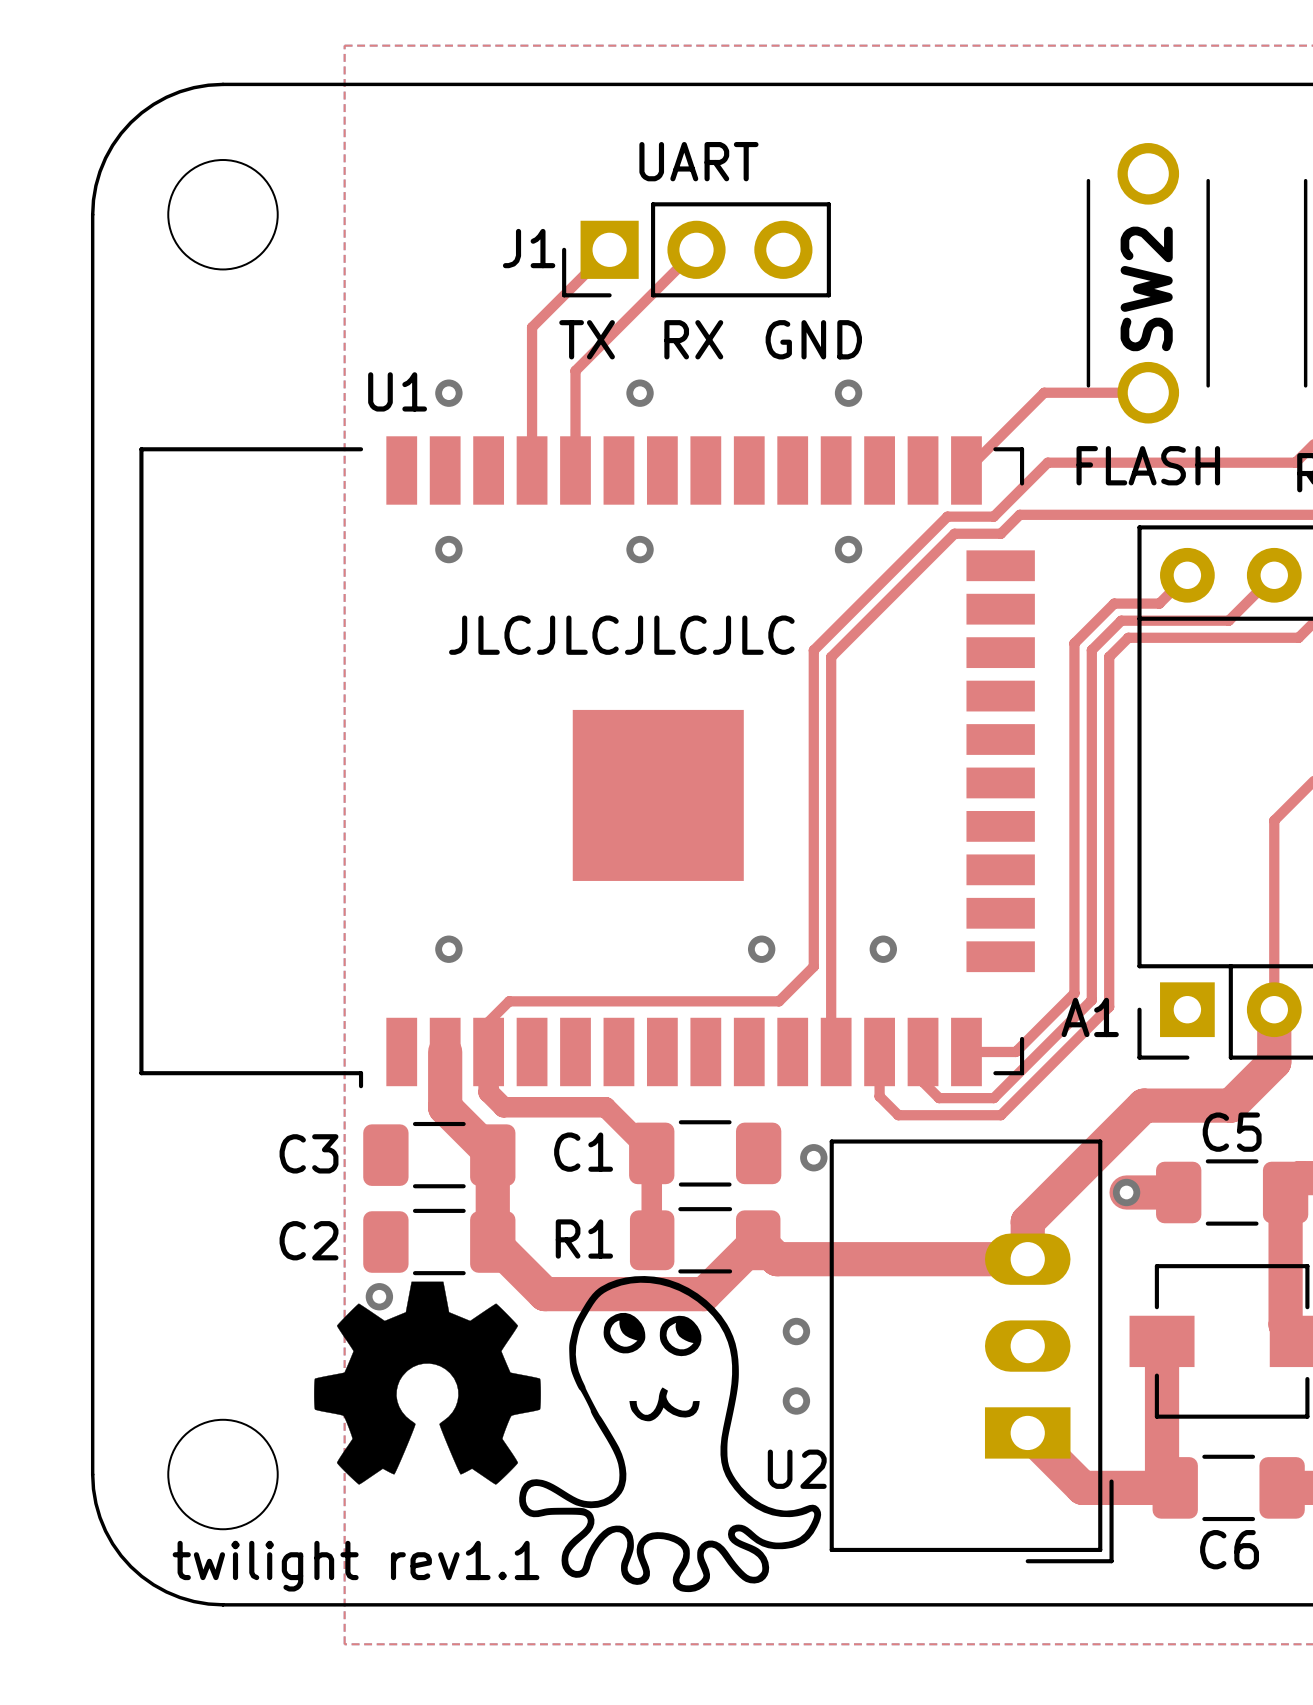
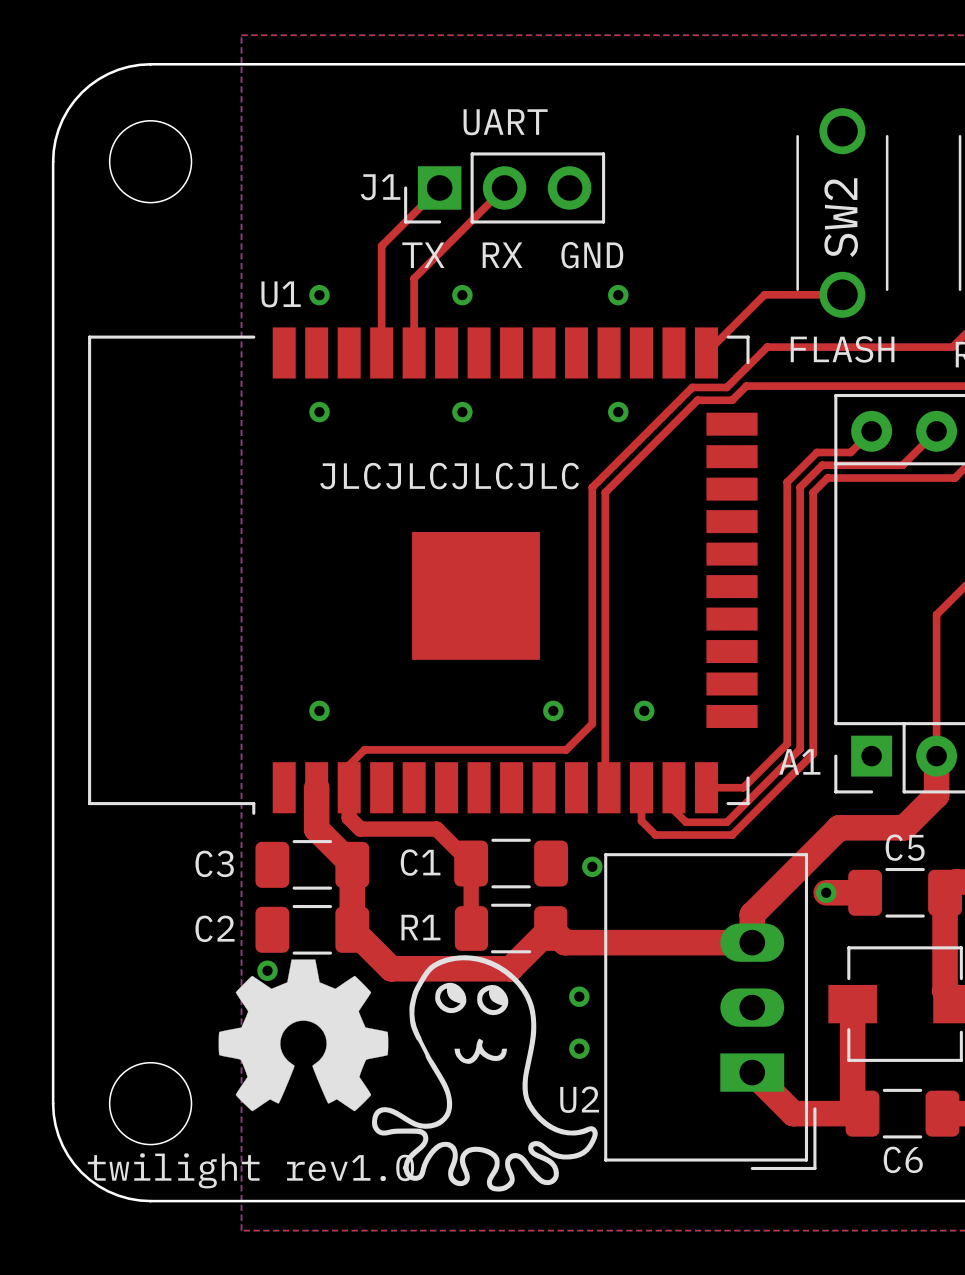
text: twilight rev1.1 (356, 1566) -> twilight rev1.0 (250, 1170)

